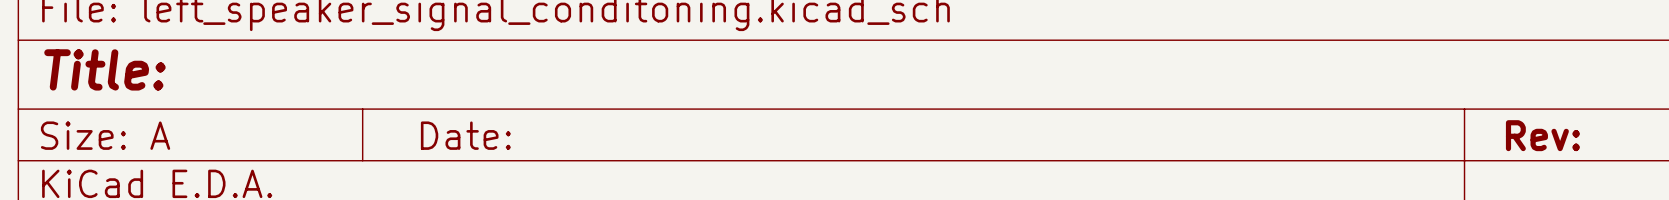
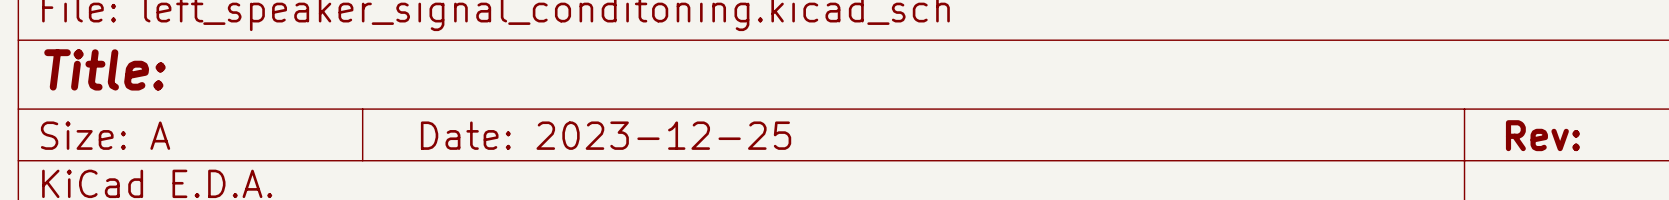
title block: Date: (465, 135) -> Date: 2023-12-25 (606, 135)

